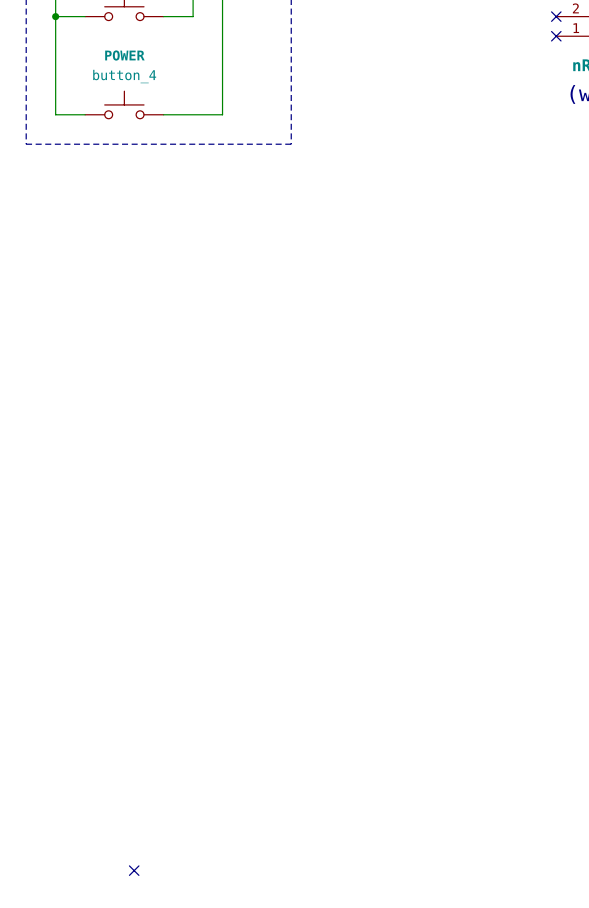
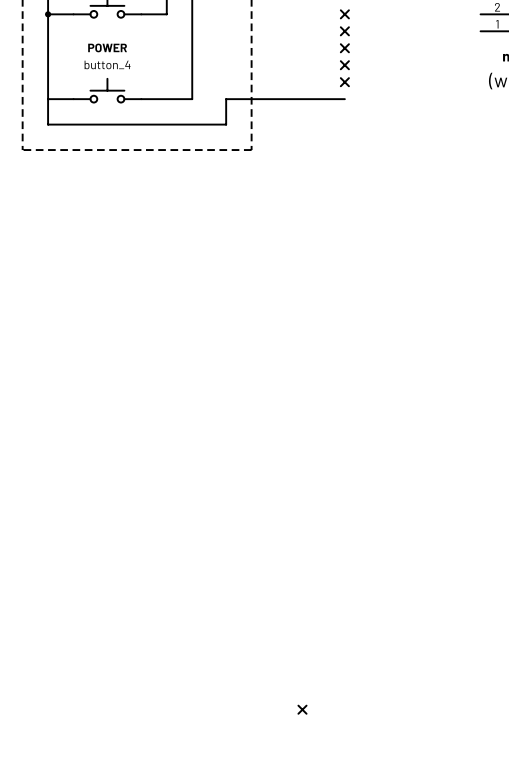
no-connect mark: none -> (344, 14)
no-connect mark: (556, 16) -> none
no-connect mark: none -> (344, 31)
no-connect mark: (556, 36) -> none
no-connect mark: none -> (344, 48)
no-connect mark: none -> (344, 65)
no-connect mark: none -> (344, 82)
wire: none -> (48, 99) (48, 124) (226, 124) (226, 99) (344, 99)
line: (26, 144) (291, 144) -> (22, 124) (22, 150) (251, 150) (251, 124)
no-connect mark: none -> (302, 709)
no-connect mark: (134, 870) -> none

